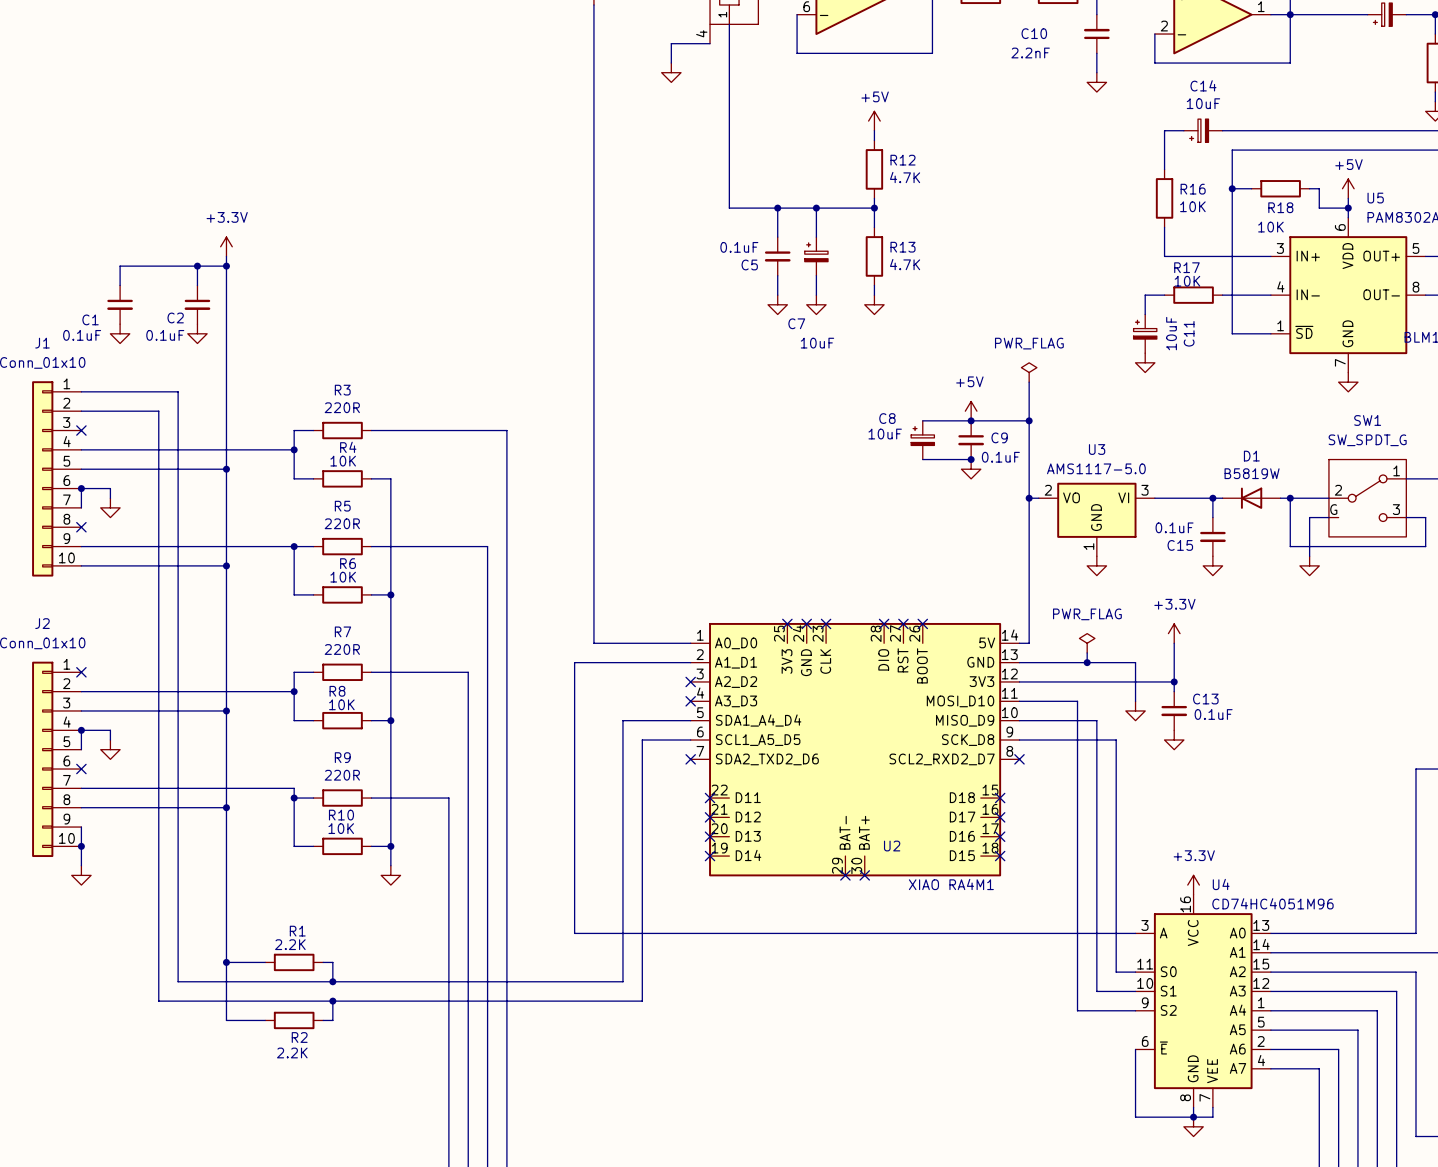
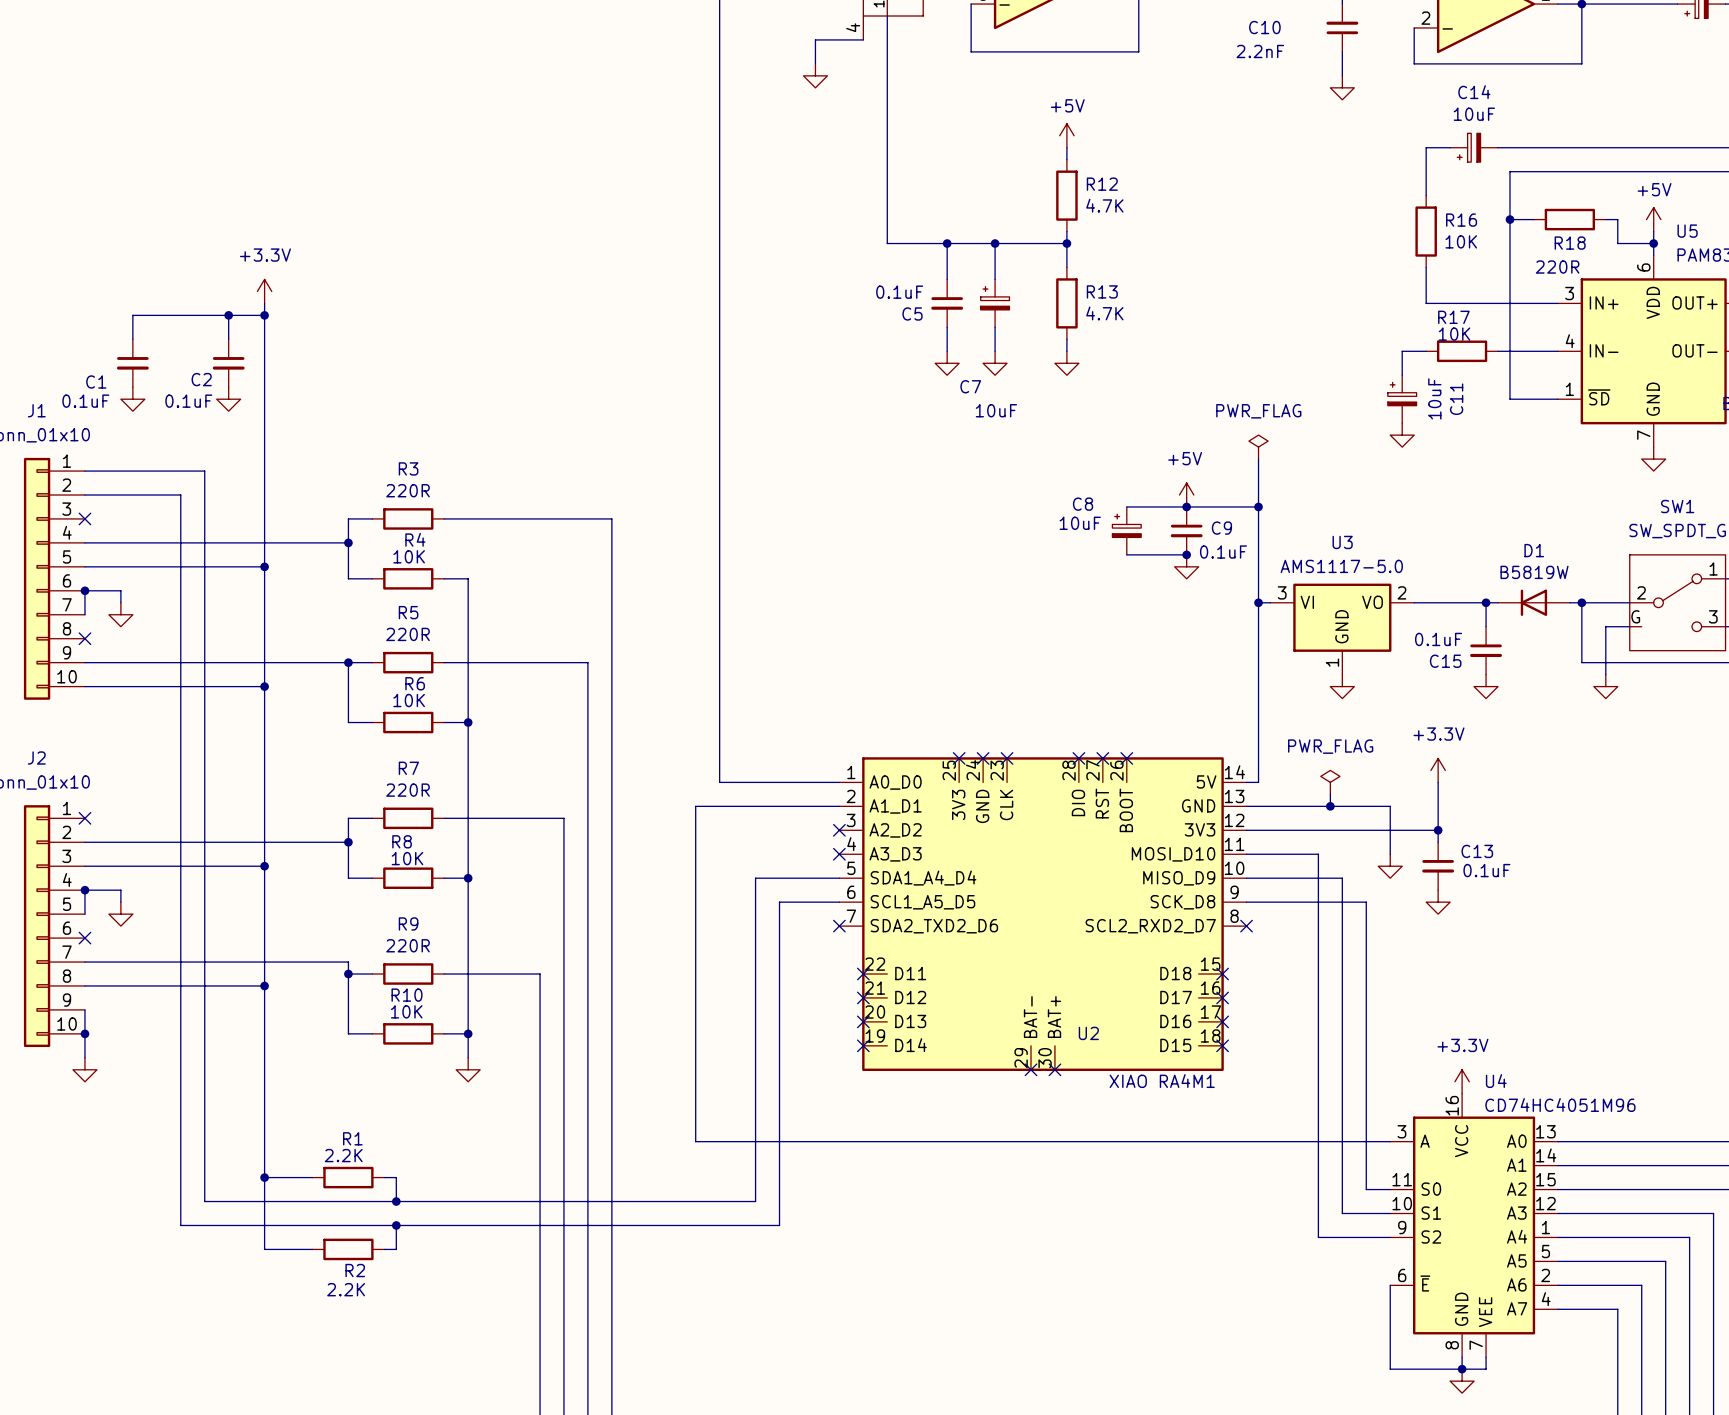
R18 value: 10K (1270, 227) -> 220R (1557, 267)
U3 flip: as is (1096, 510) -> left-right (1342, 617)

